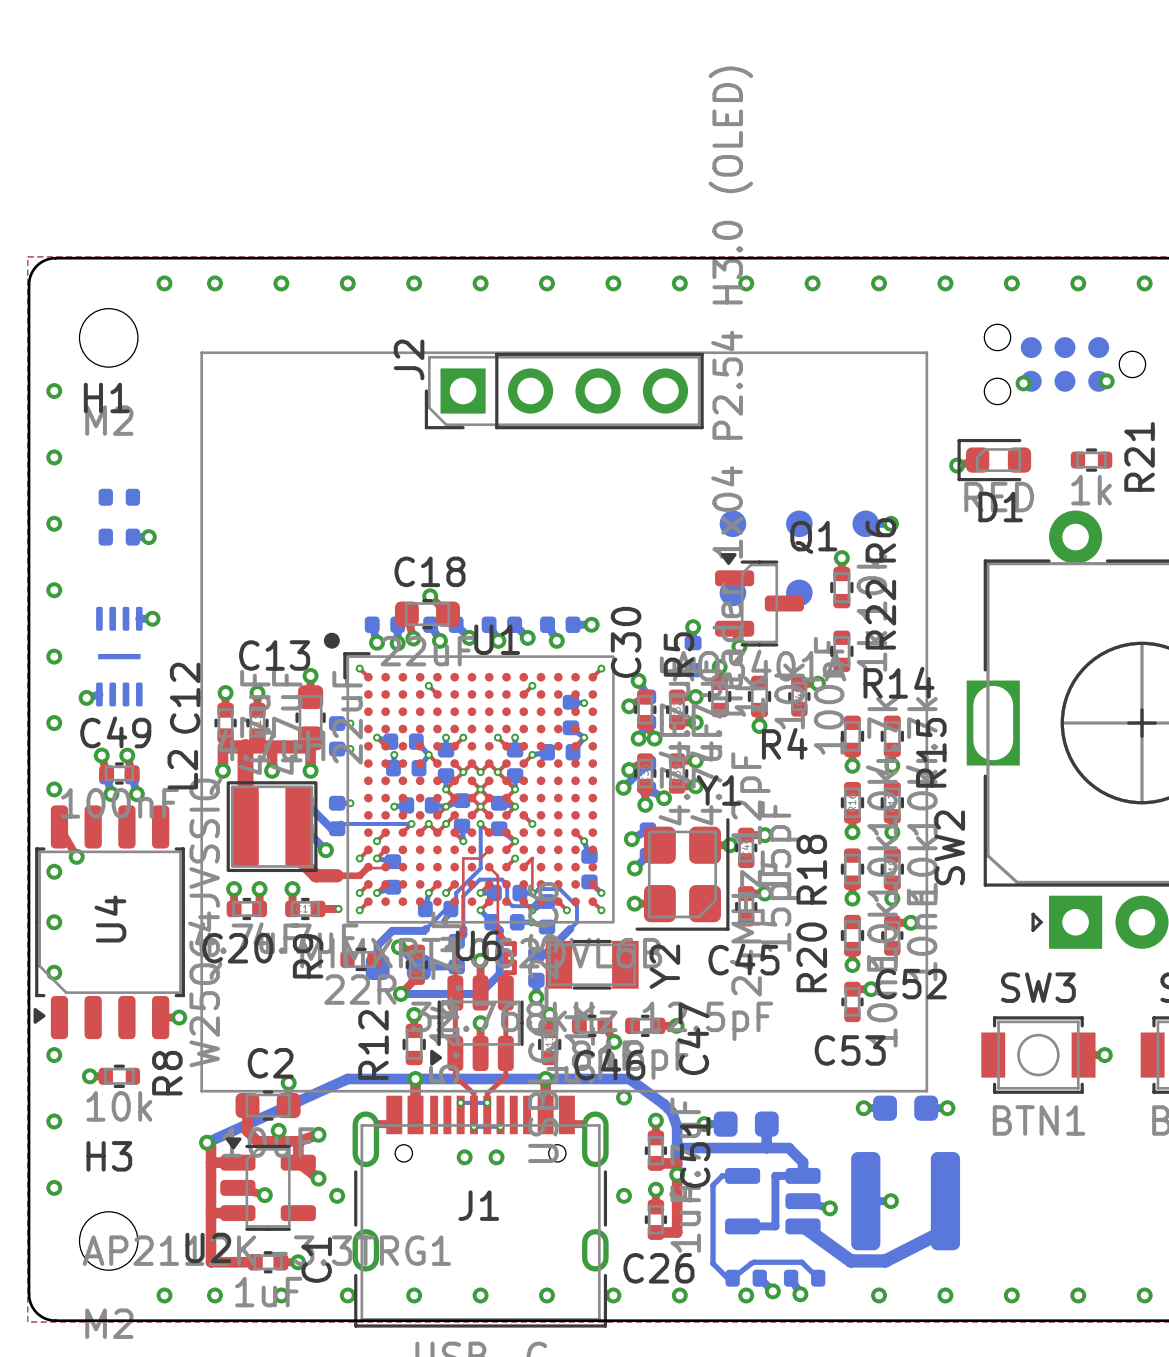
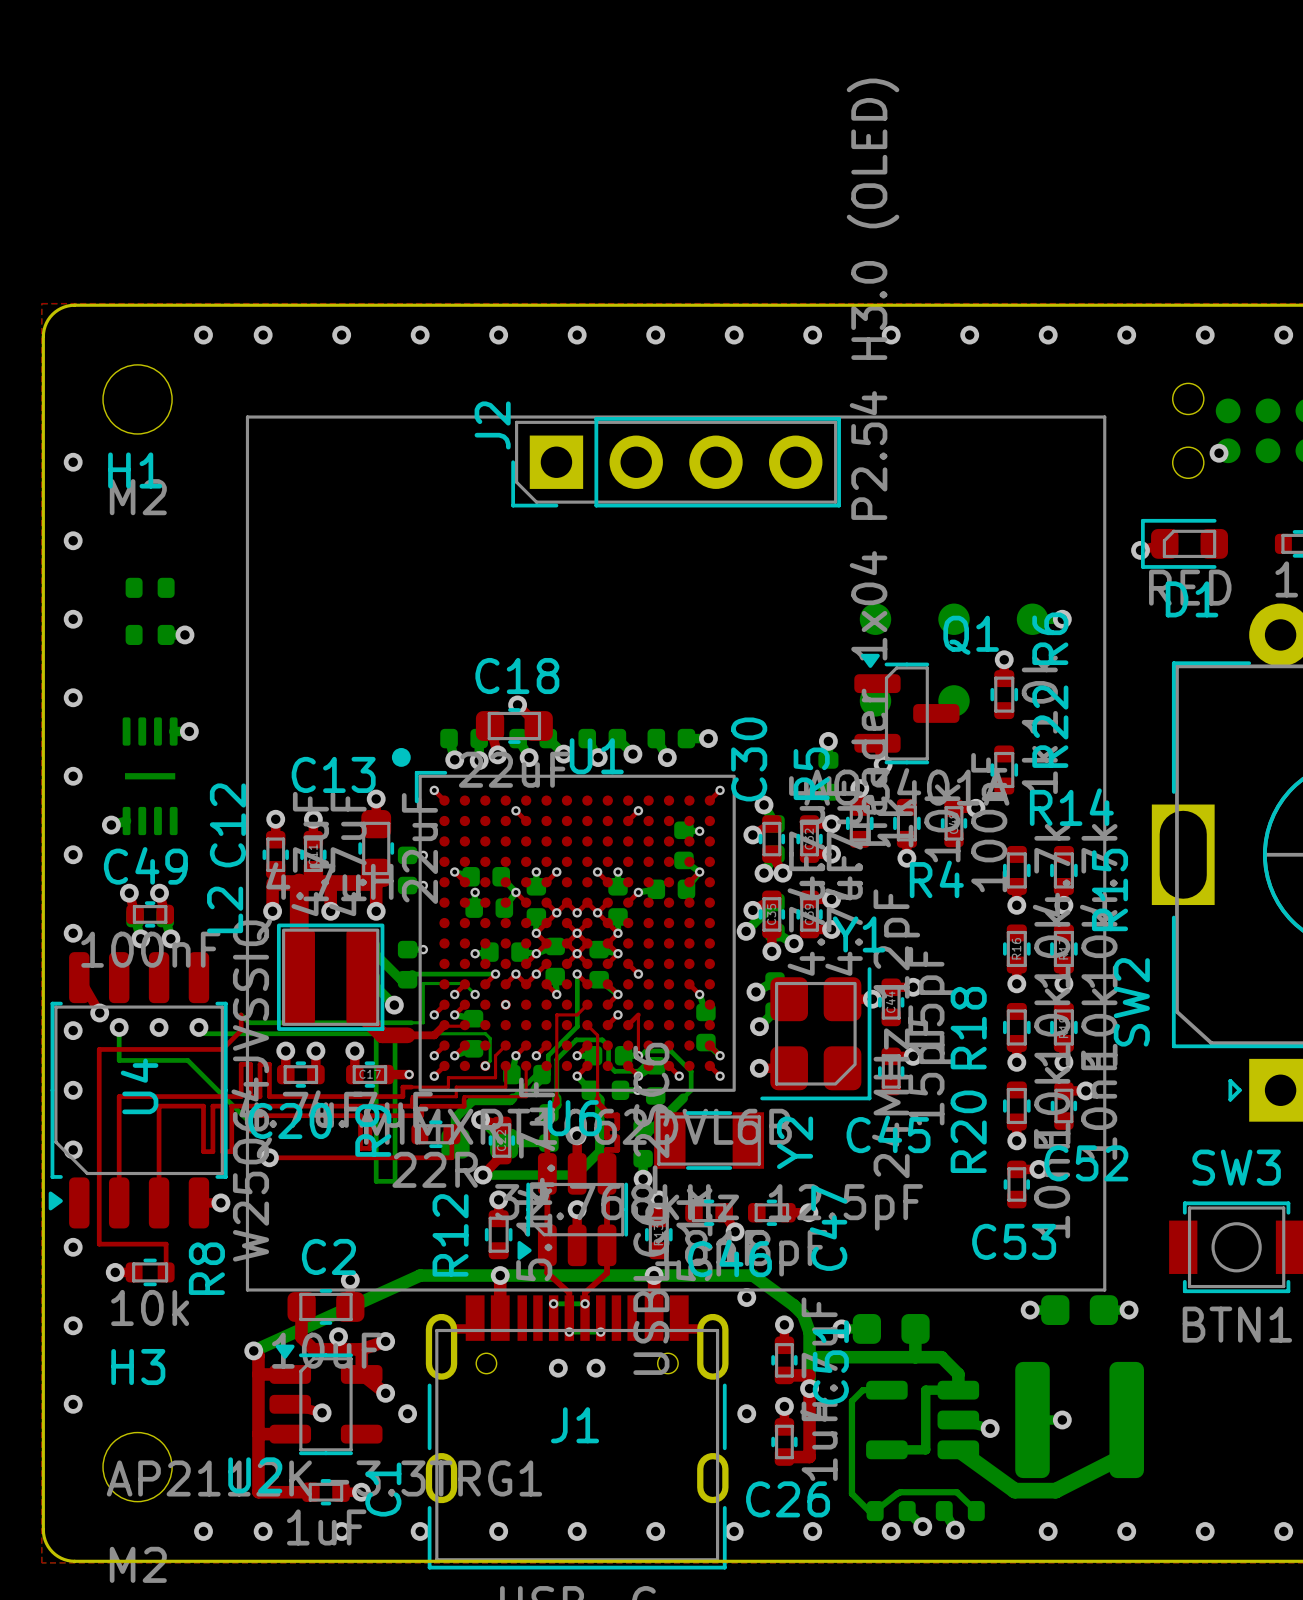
bottom track: none -> (475, 994) (464, 983) (423, 983) (423, 1022) (249, 1022) (241, 1014)
via: none -> (475, 994)
via: none -> (505, 1004)
top track: none -> (241, 1014) (241, 1030) (222, 1049) (99, 1049) (99, 1244) (166, 1244) (166, 1272)
bottom track: none -> (119, 1027) (119, 1060) (187, 1060) (250, 1123) (250, 1131)
via: none -> (119, 1027)
via: none -> (159, 1027)
bottom track: none -> (198, 1027) (205, 1033) (376, 1033) (376, 1181) (395, 1181) (395, 1033) (485, 1033) (490, 1038) (490, 1061) (485, 1065)
via: none -> (198, 1027)
top track: none -> (505, 1045) (495, 1055) (495, 1077) (448, 1077) (448, 1087) (402, 1087) (402, 1096) (269, 1096) (269, 1064) (260, 1064) (260, 1096) (250, 1096) (250, 1064) (241, 1064) (241, 1096) (119, 1096) (119, 1202)
via: none -> (485, 1065)
top track: none -> (505, 1065) (505, 1087) (456, 1087) (456, 1096) (412, 1096) (412, 1106) (231, 1106) (231, 1151) (222, 1151) (222, 1106) (212, 1106) (212, 1151) (203, 1151) (203, 1106) (159, 1106) (159, 1202)
top track: none -> (526, 1065) (526, 1096) (464, 1096) (464, 1106) (421, 1106) (421, 1115) (369, 1115) (369, 1148) (360, 1148) (360, 1115) (250, 1115) (250, 1131)
top track: none -> (451, 1134) (451, 1157) (269, 1157)
via: none -> (269, 1157)

